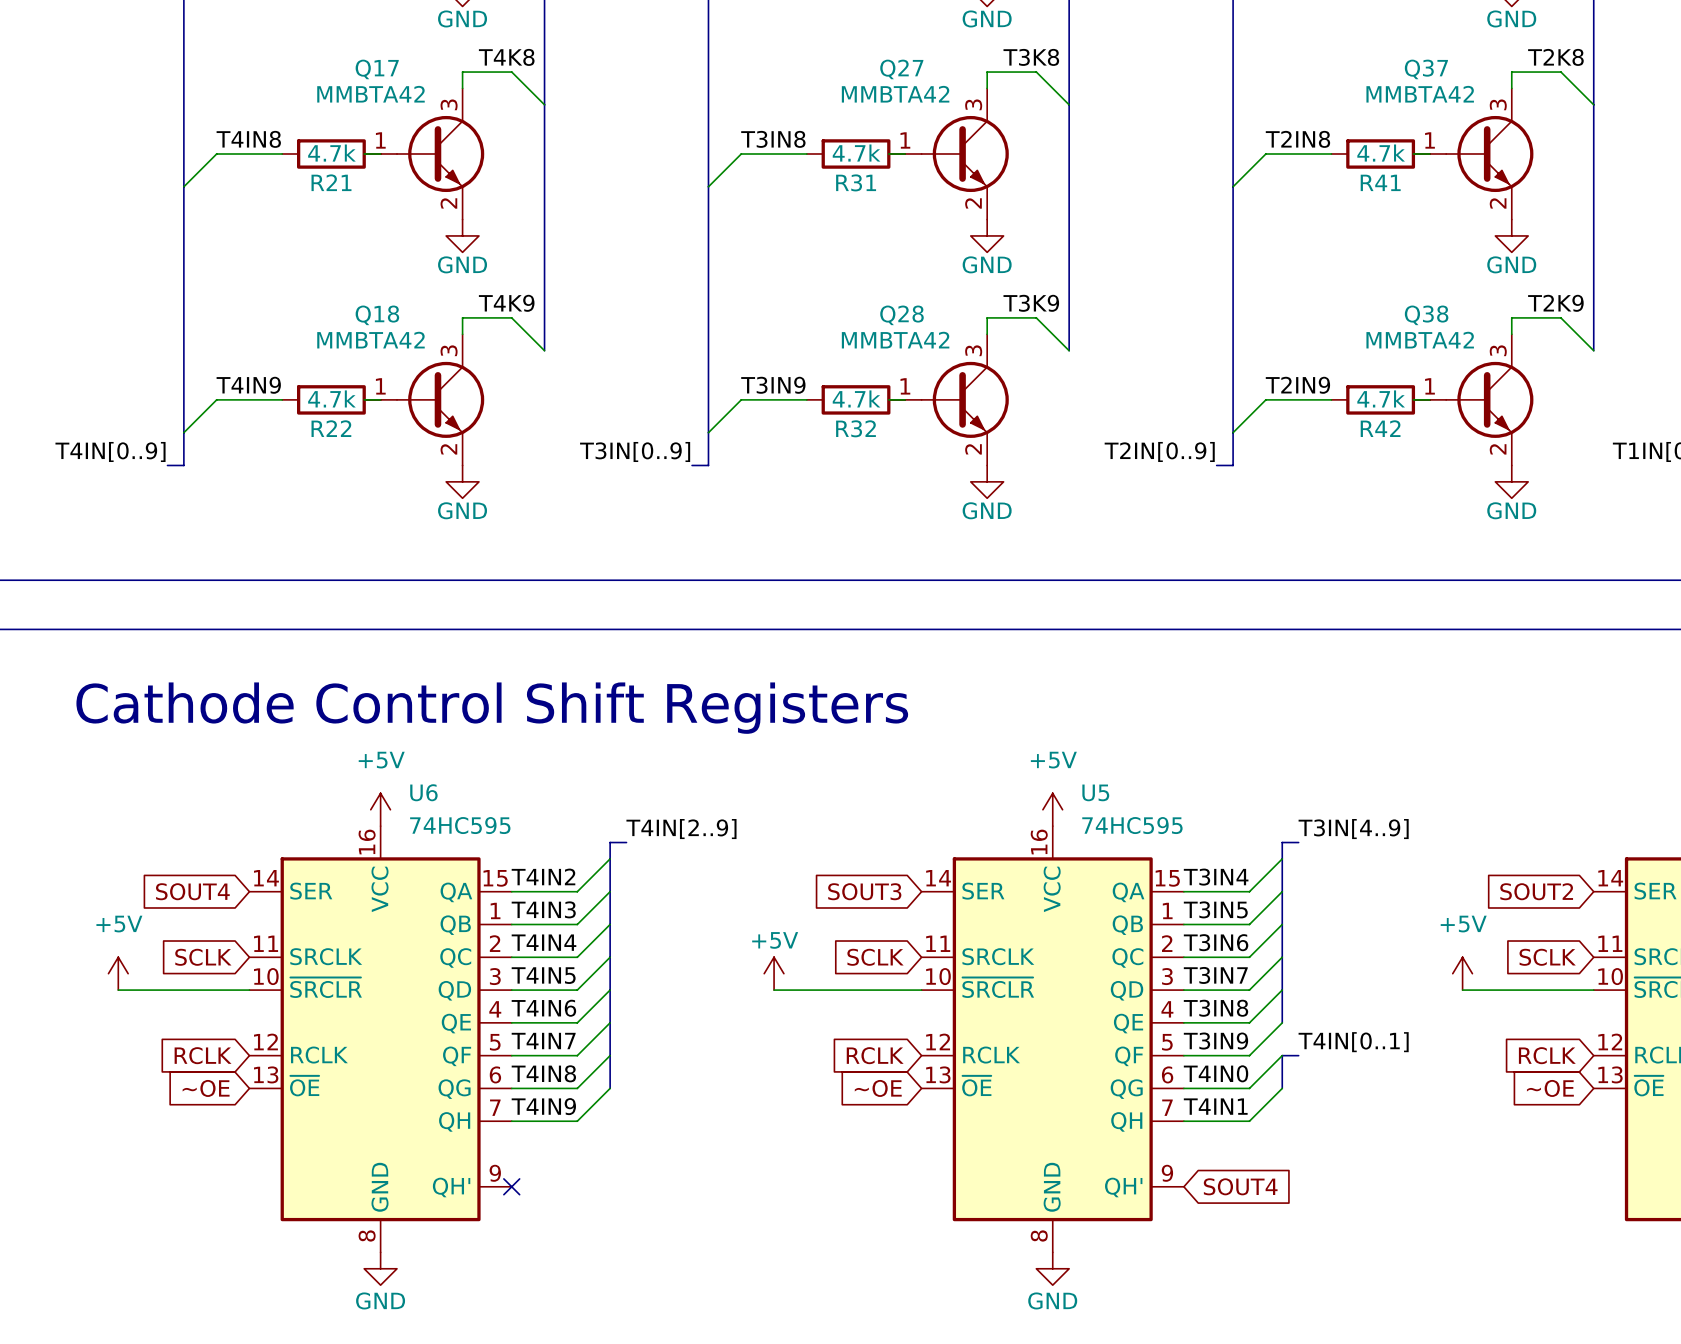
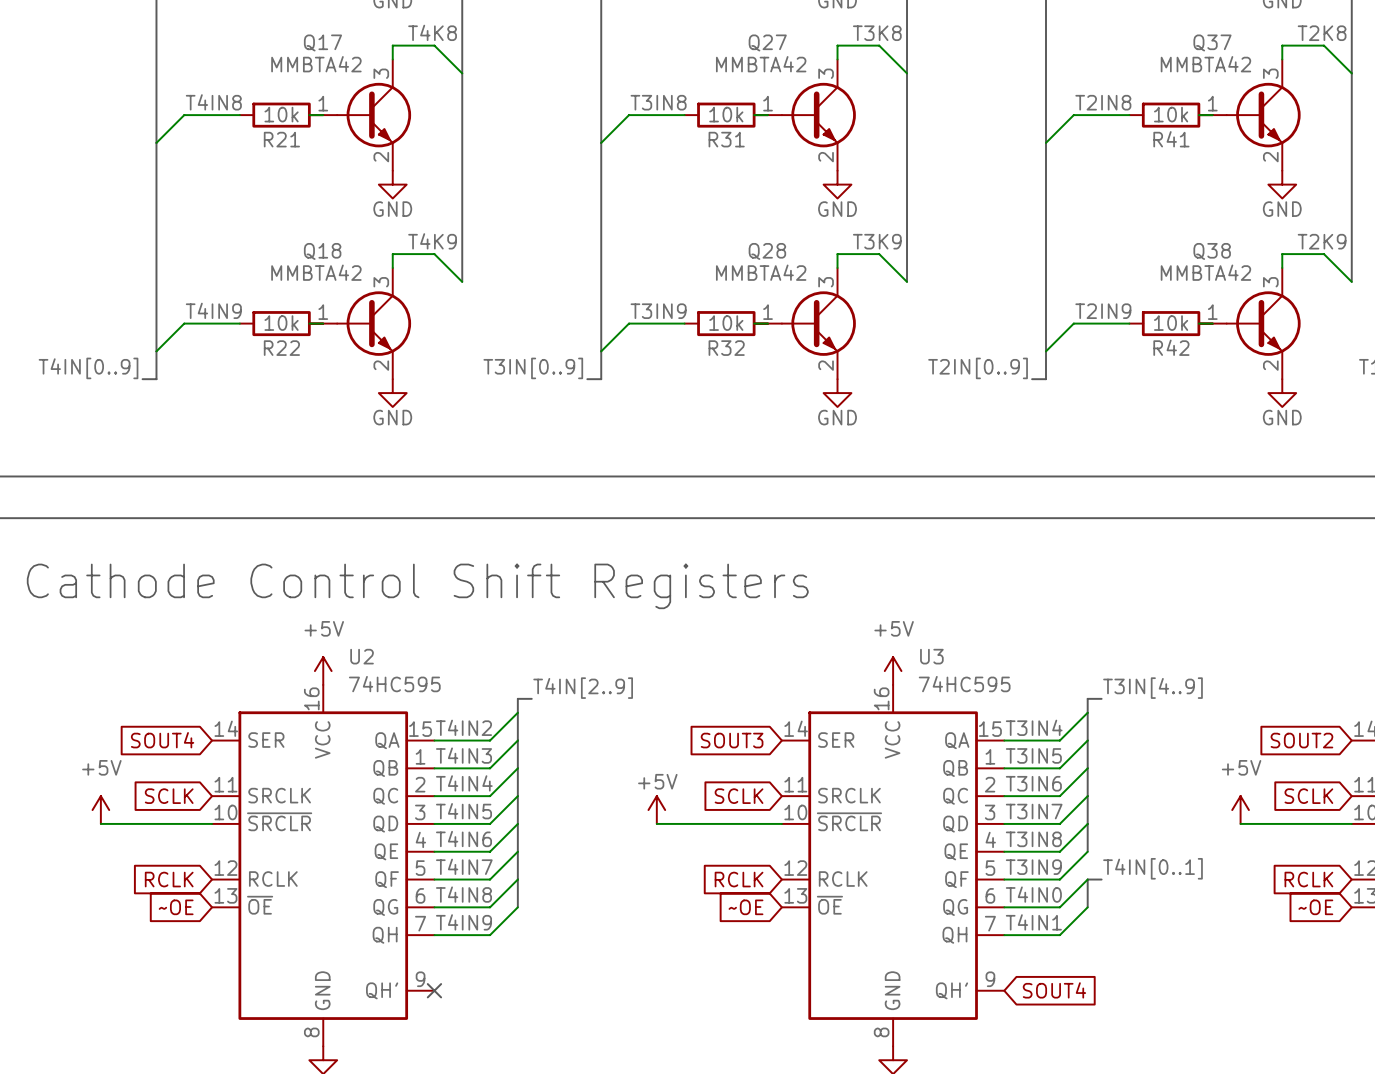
R21 value: 4.7k (331, 153) -> 10k (281, 114)
R31 value: 4.7k (856, 153) -> 10k (726, 114)
R41 value: 4.7k (1381, 153) -> 10k (1171, 114)
R22 value: 4.7k (331, 398) -> 10k (281, 323)
R32 value: 4.7k (856, 398) -> 10k (726, 323)
R42 value: 4.7k (1381, 398) -> 10k (1171, 323)
U6 name: U6 (423, 792) -> U2 (362, 656)
U5 name: U5 (1095, 792) -> U3 (931, 656)

